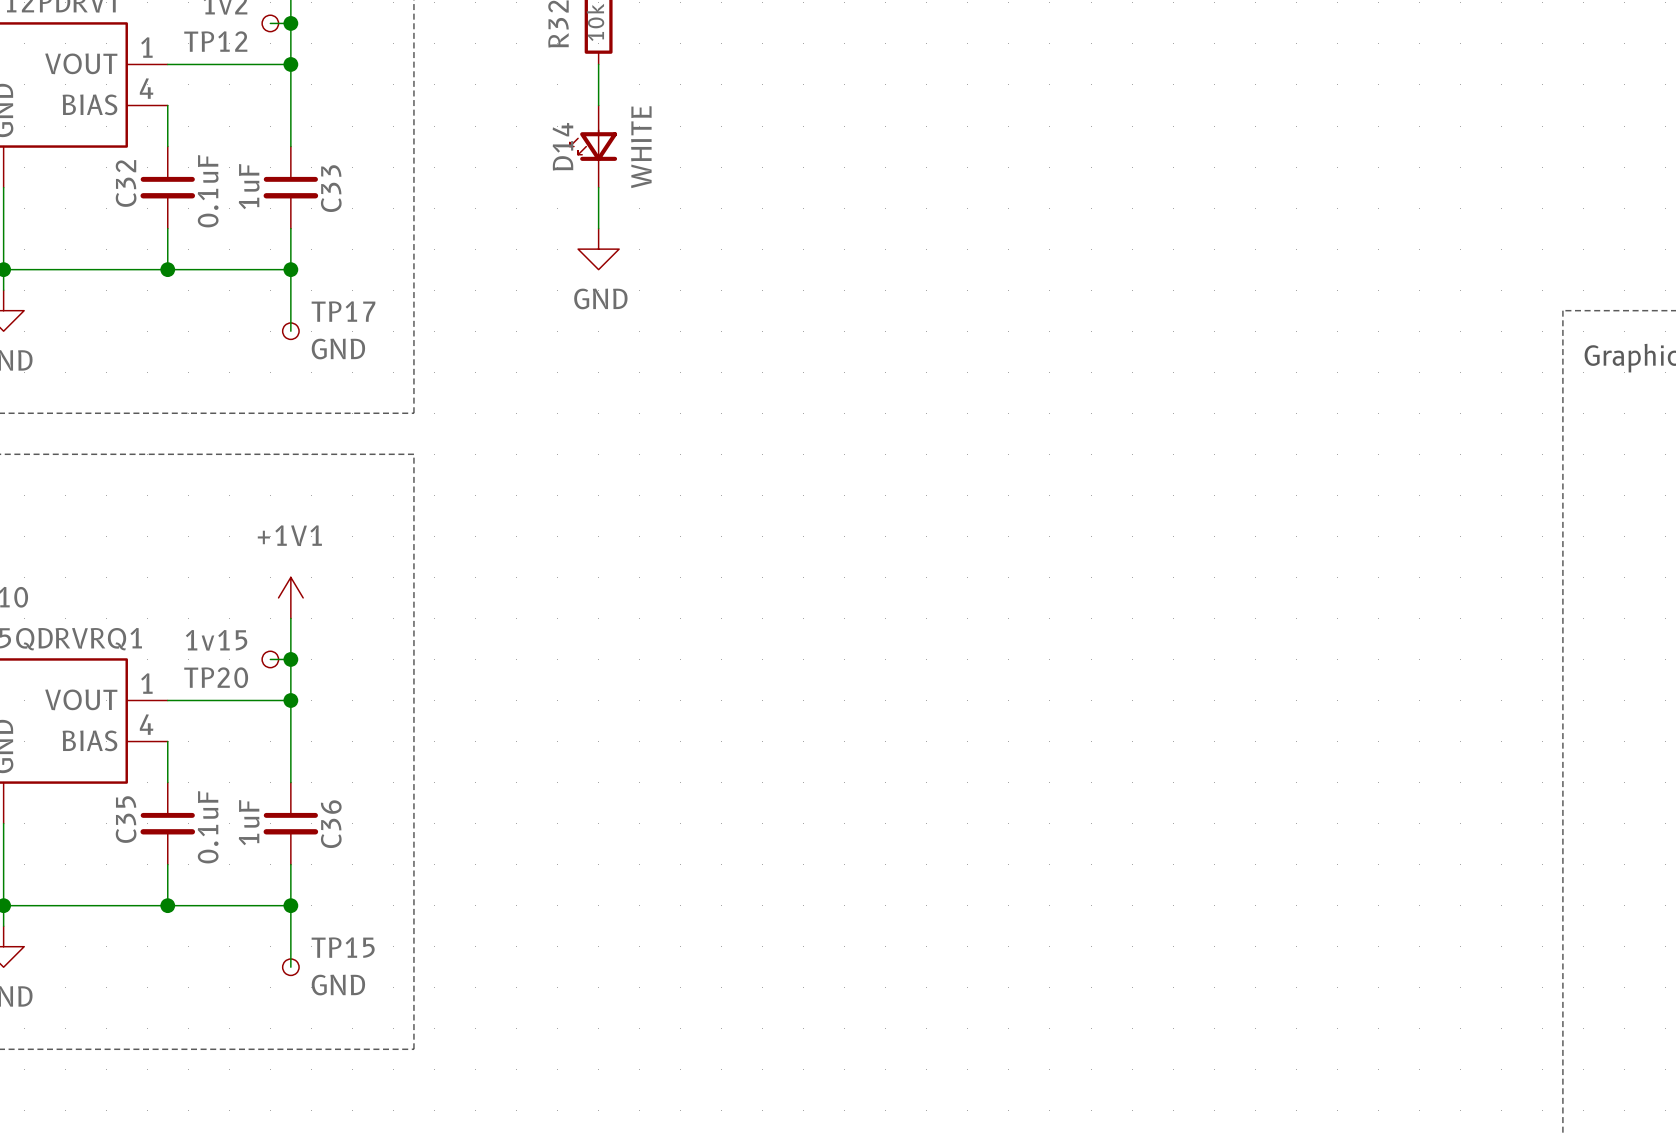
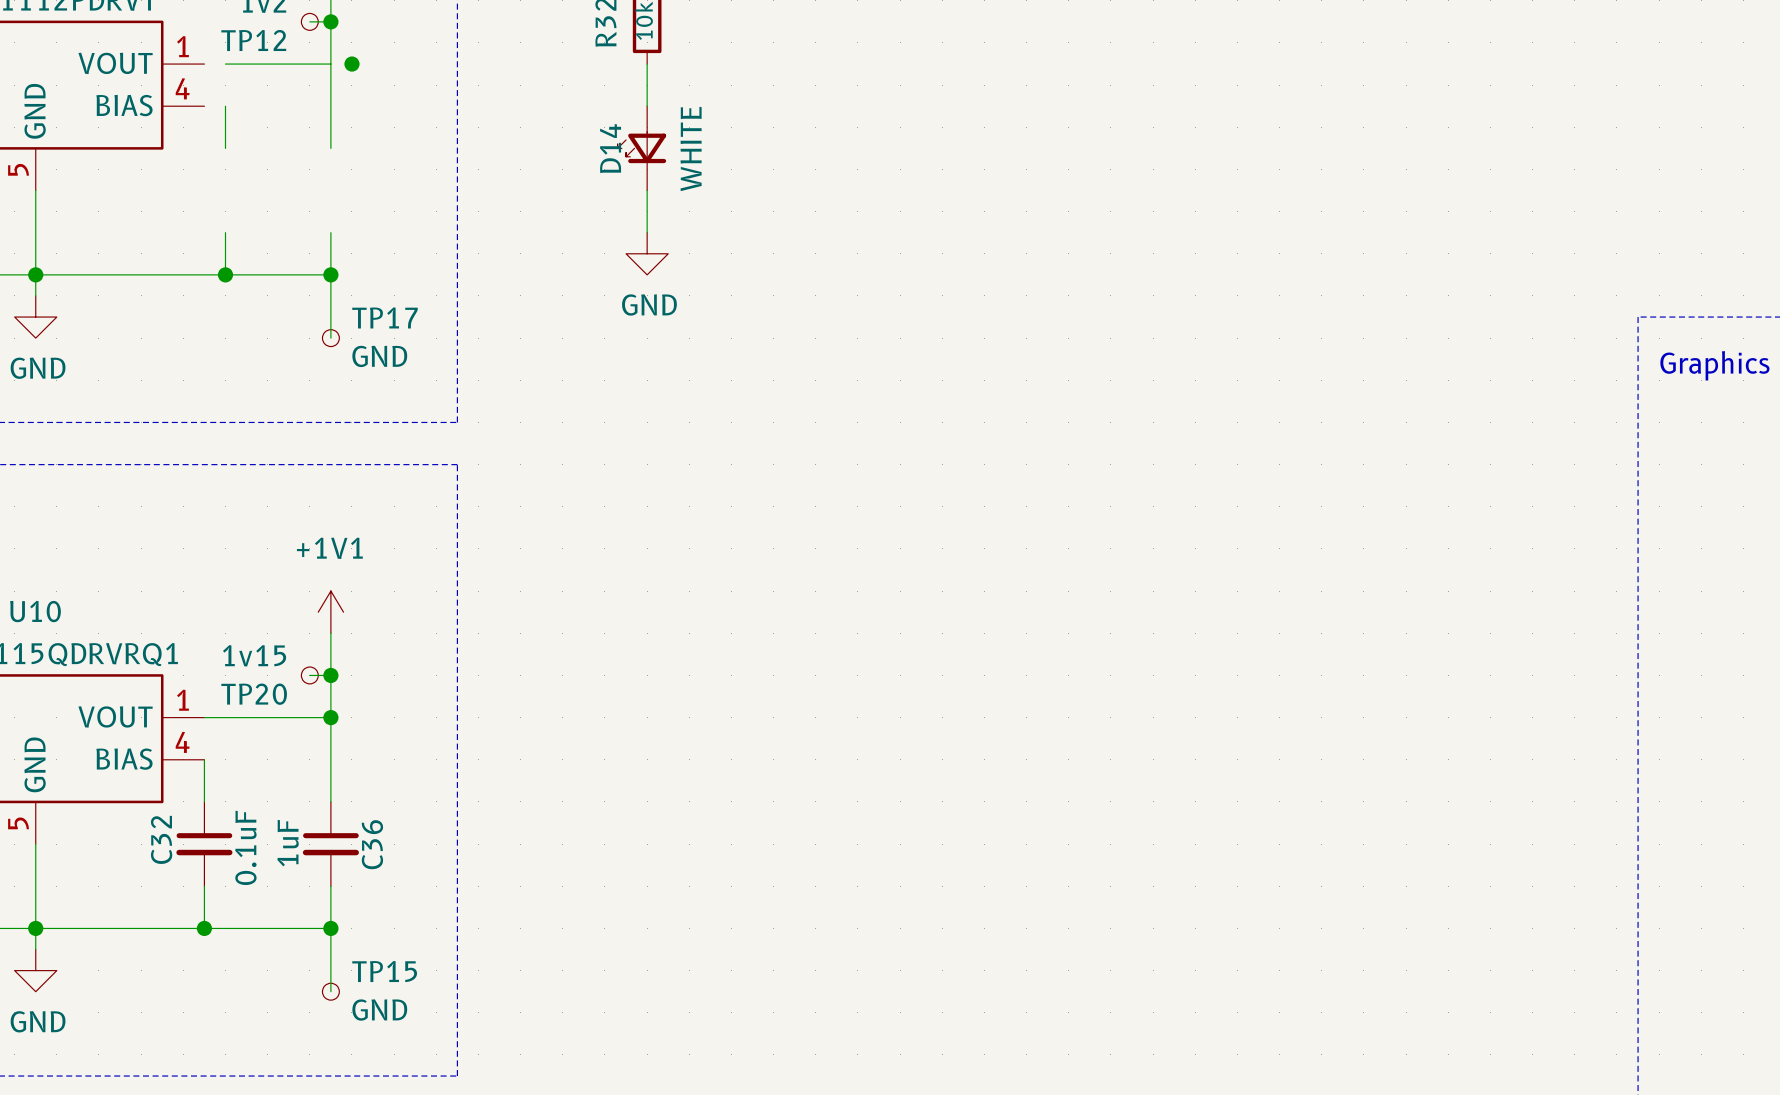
wire: (167, 64) (188, 64) -> none
junction position: (290, 64) -> (351, 64)
wire: (167, 105) (167, 146) -> (225, 106) (225, 148)
C32: 0.1uF (167, 187) -> none
C33: 1uF (290, 187) -> none
wire: (167, 228) (167, 269) -> (225, 232) (225, 274)
junction position: (167, 269) -> (225, 274)
C35 name: C35 (126, 819) -> C32 (161, 839)

